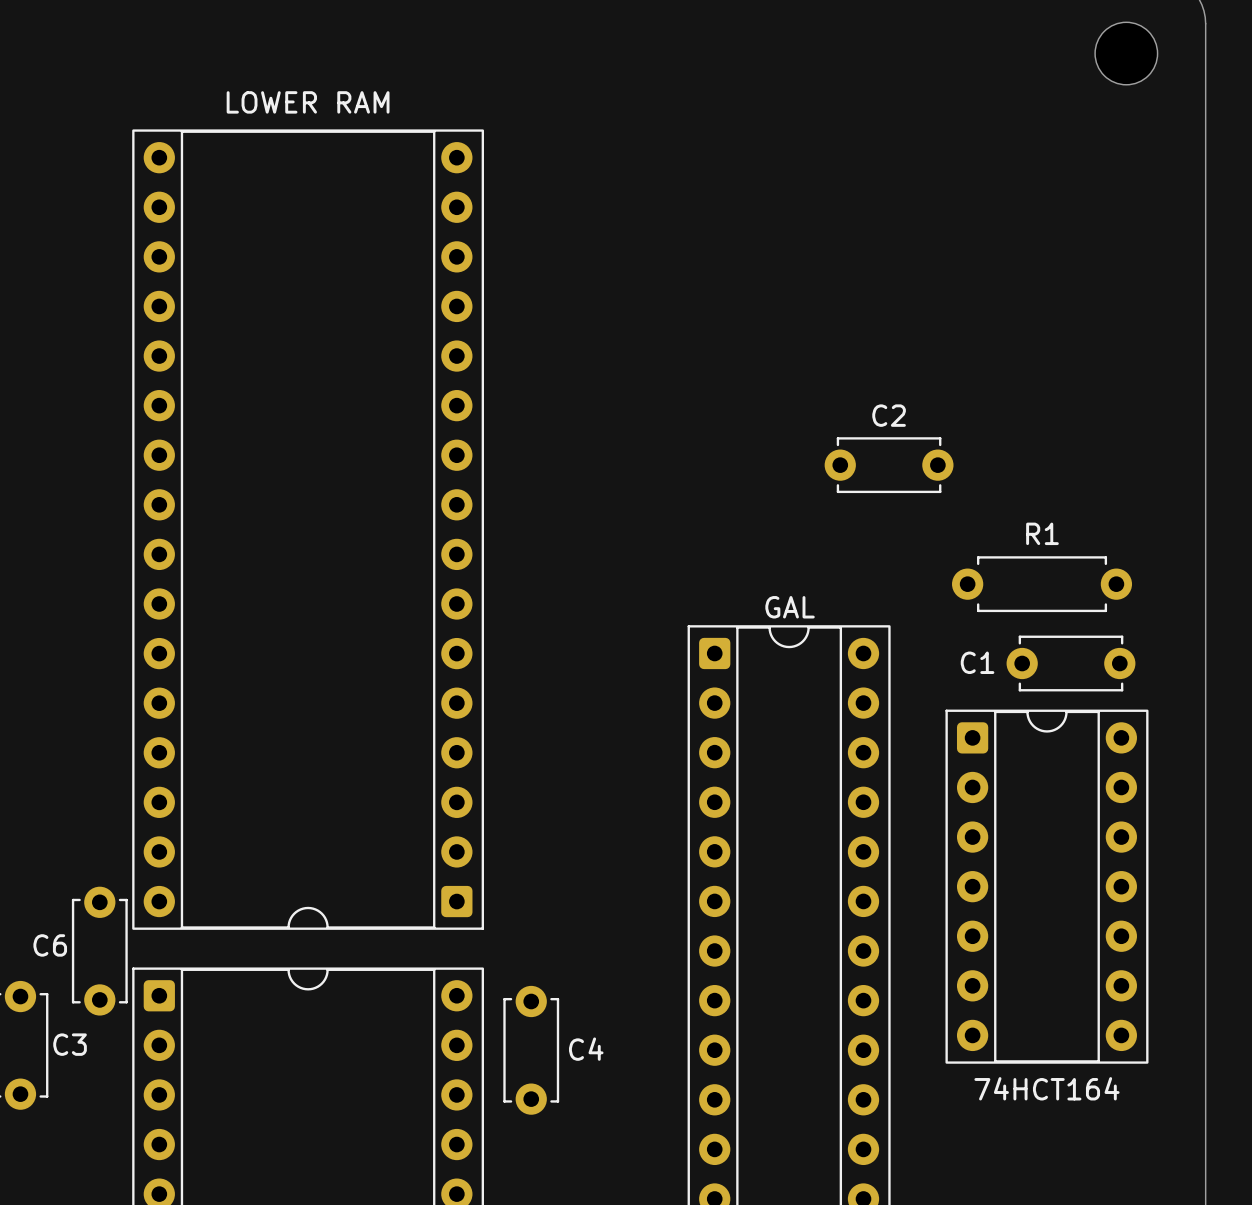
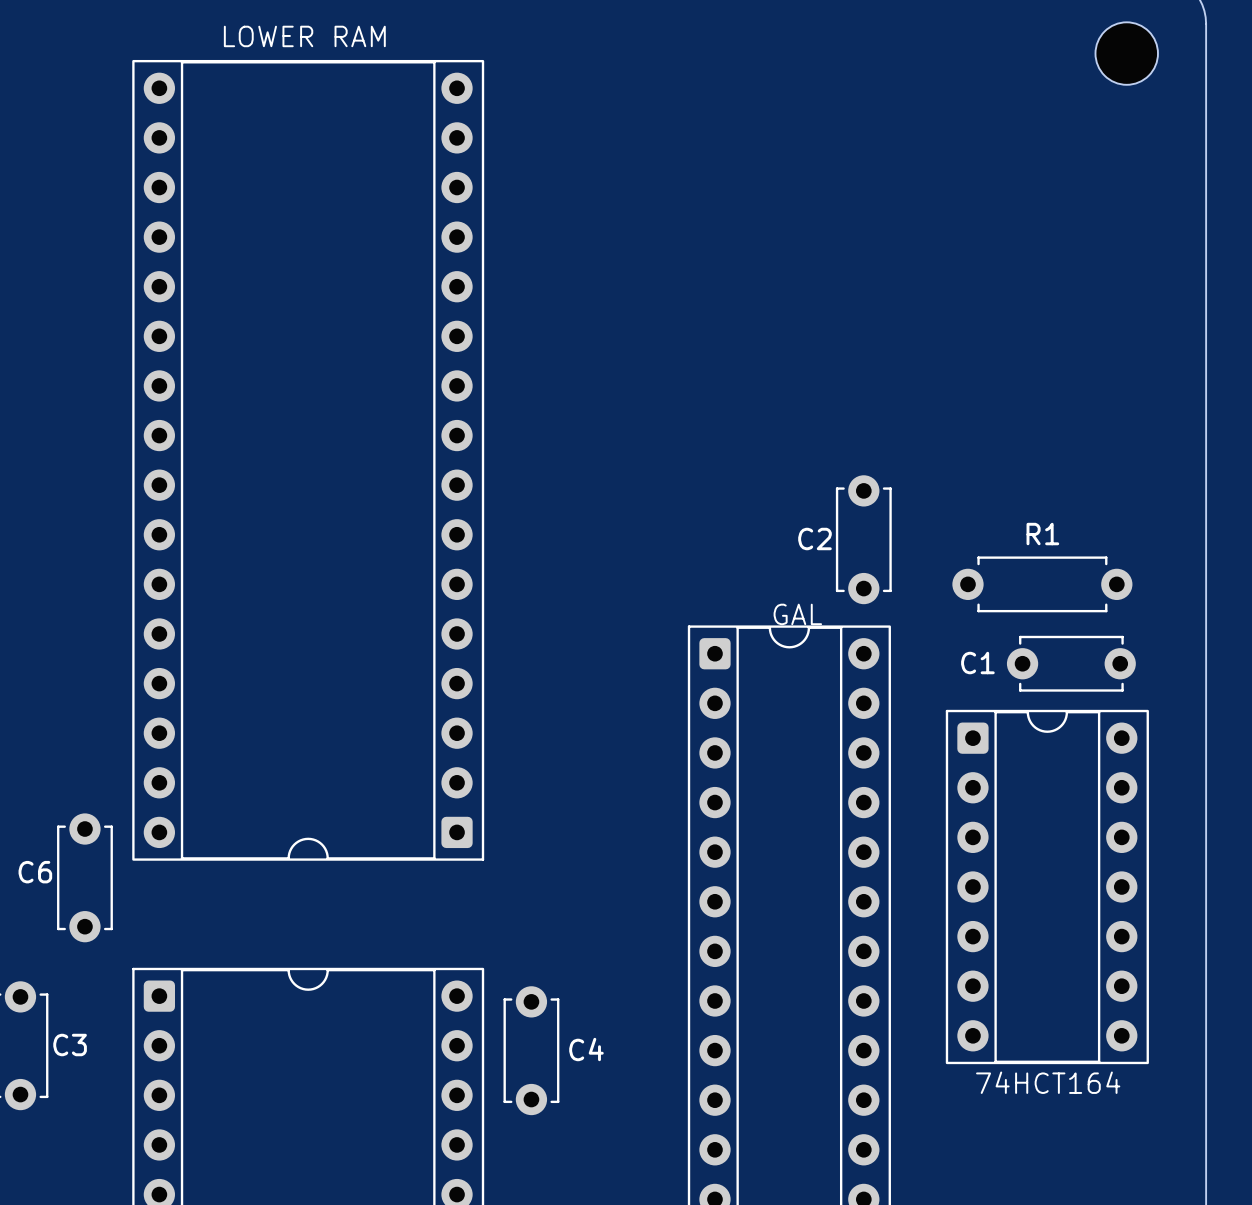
text: none -> LOWER RAM (304, 36)
C2 name position: C2 (889, 415) -> C2 (814, 539)
part: none -> (308, 460)
C2 rotation: 0° (889, 465) -> 90° clockwise (863, 539)
C2 position: (889, 465) -> (863, 539)
LOWER RAM: (308, 529) -> none
GAL name: GAL (790, 607) -> none
text: none -> GAL (797, 614)
C6 position: (99, 951) -> (84, 877)
text: none -> 74HCT164 (1048, 1082)
74HCT164 name: 74HCT164 (1046, 1088) -> none

